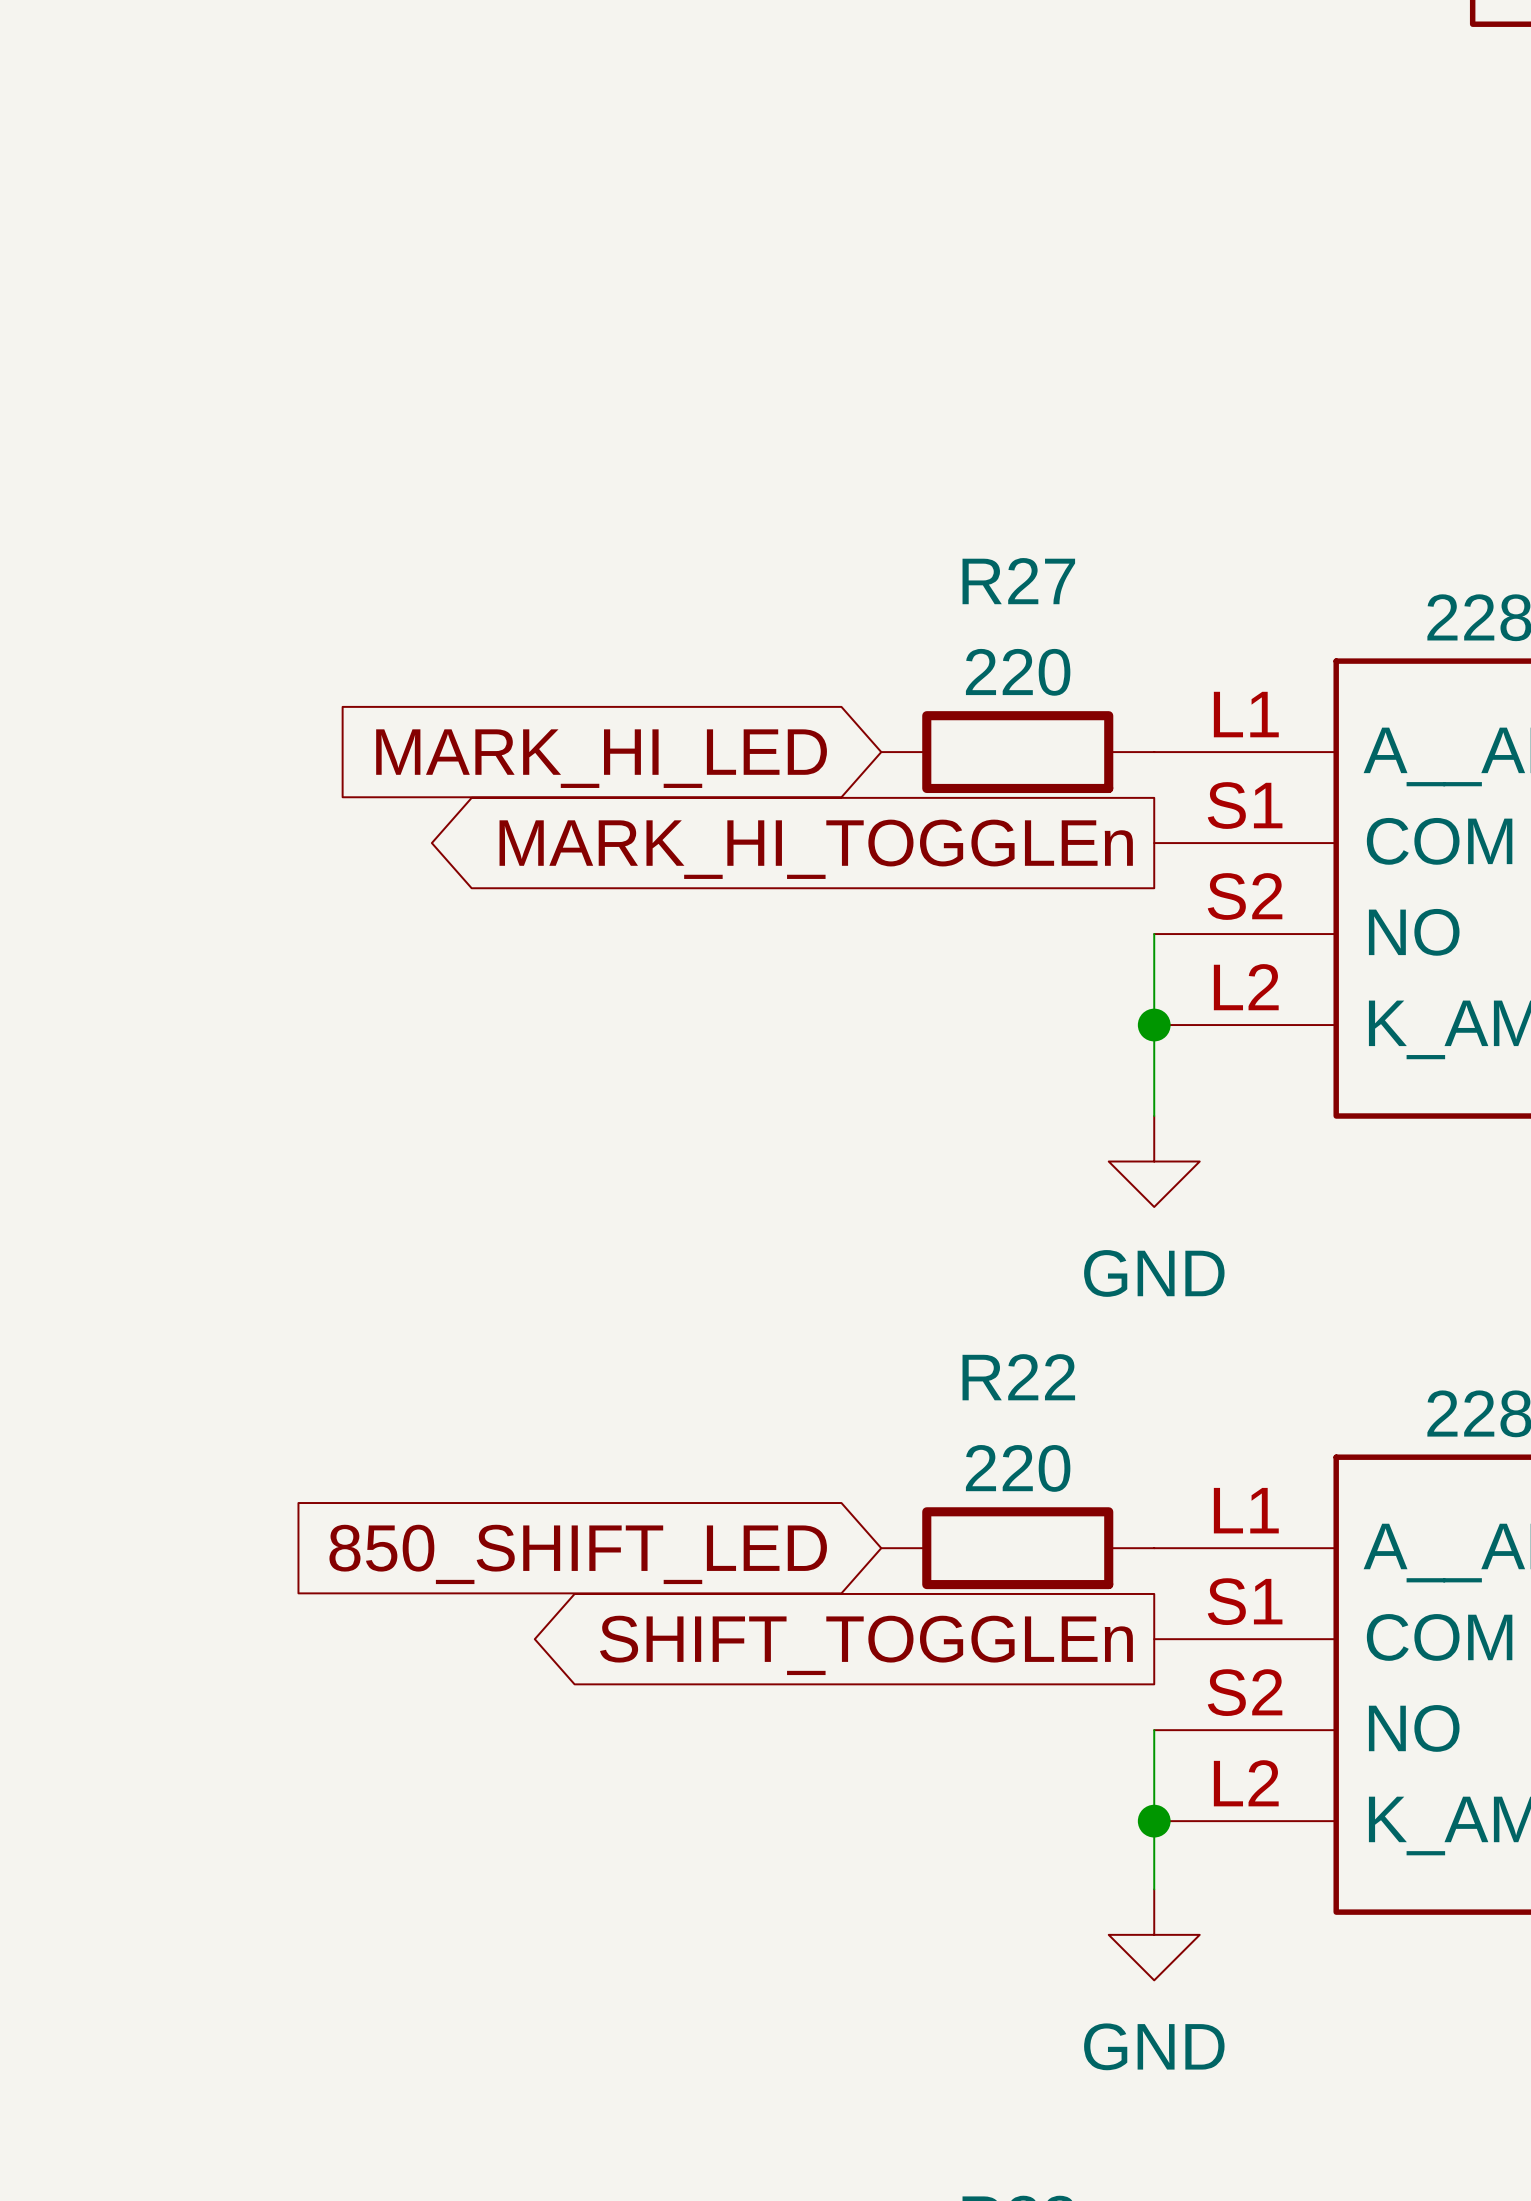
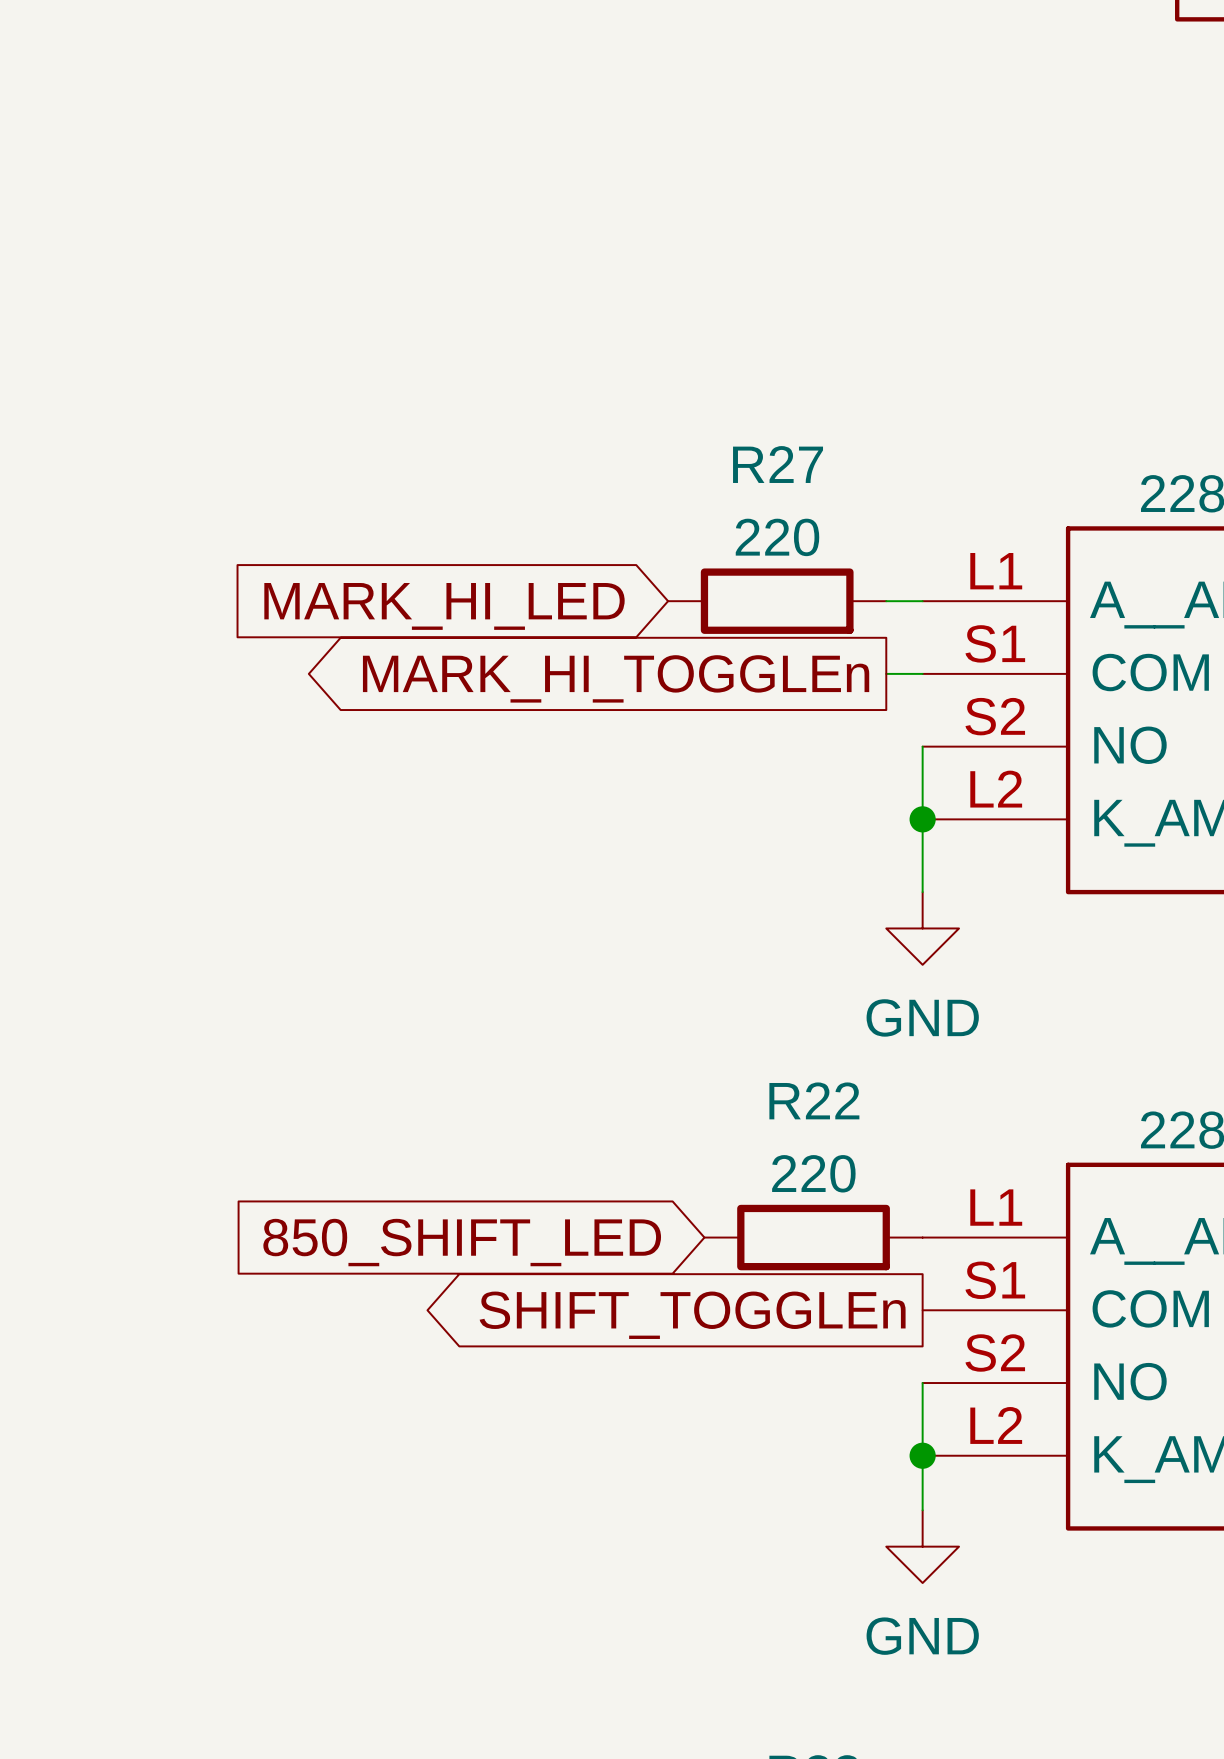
R27 position: (1017, 752) -> (777, 601)
global label position: MARK_HI_LED (601, 758) -> MARK_HI_LED (444, 606)
wire: none -> (886, 673) (922, 673)
global label position: MARK_HI_TOGGLEn (816, 849) -> MARK_HI_TOGGLEn (616, 678)

